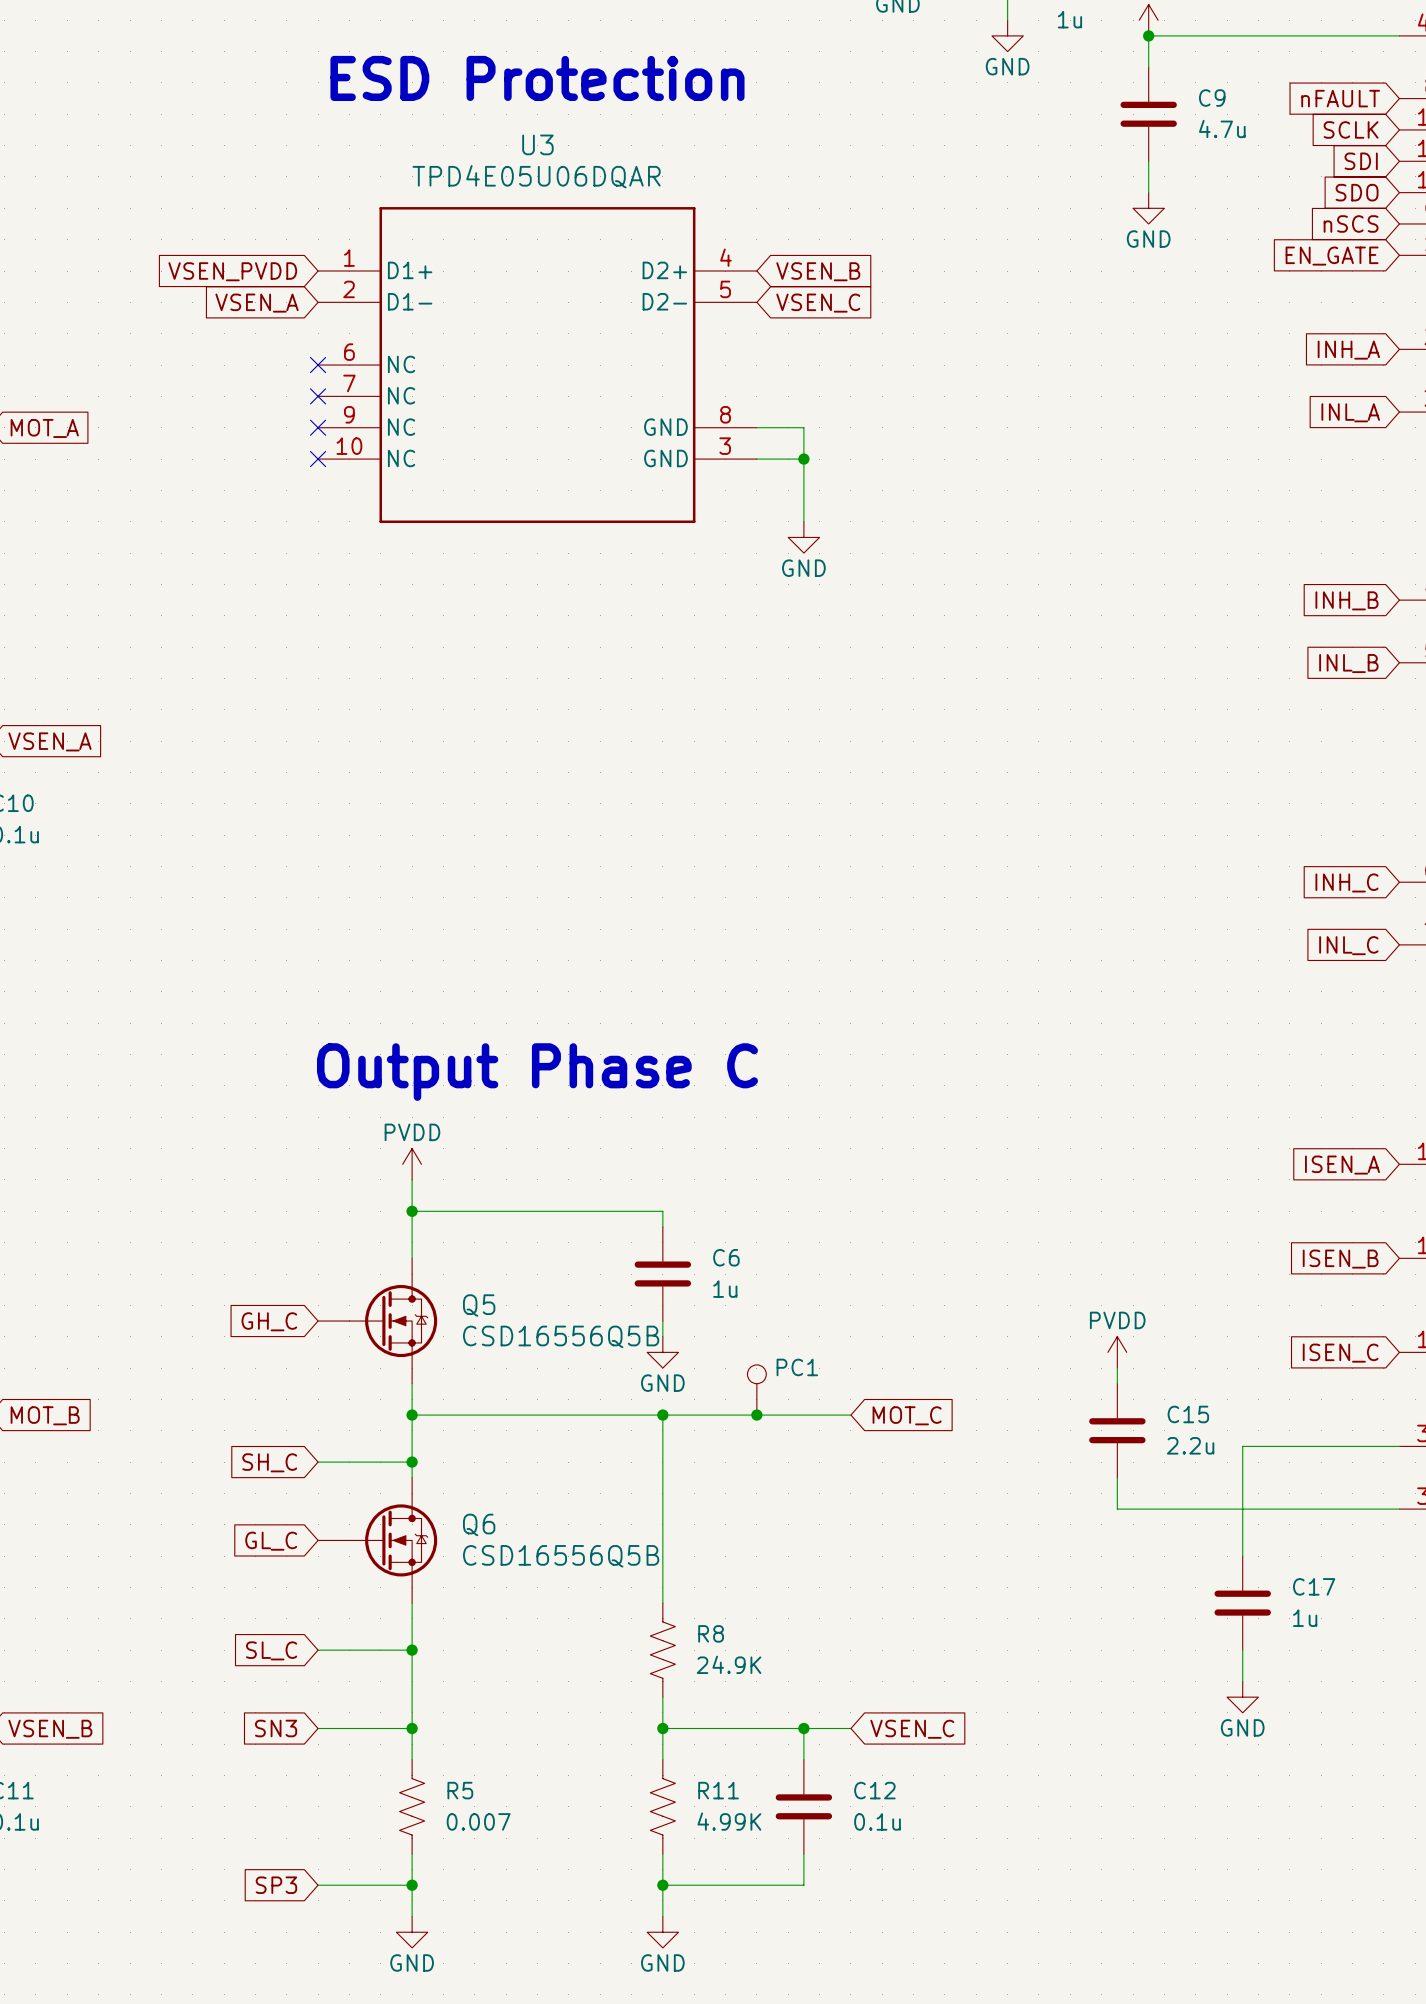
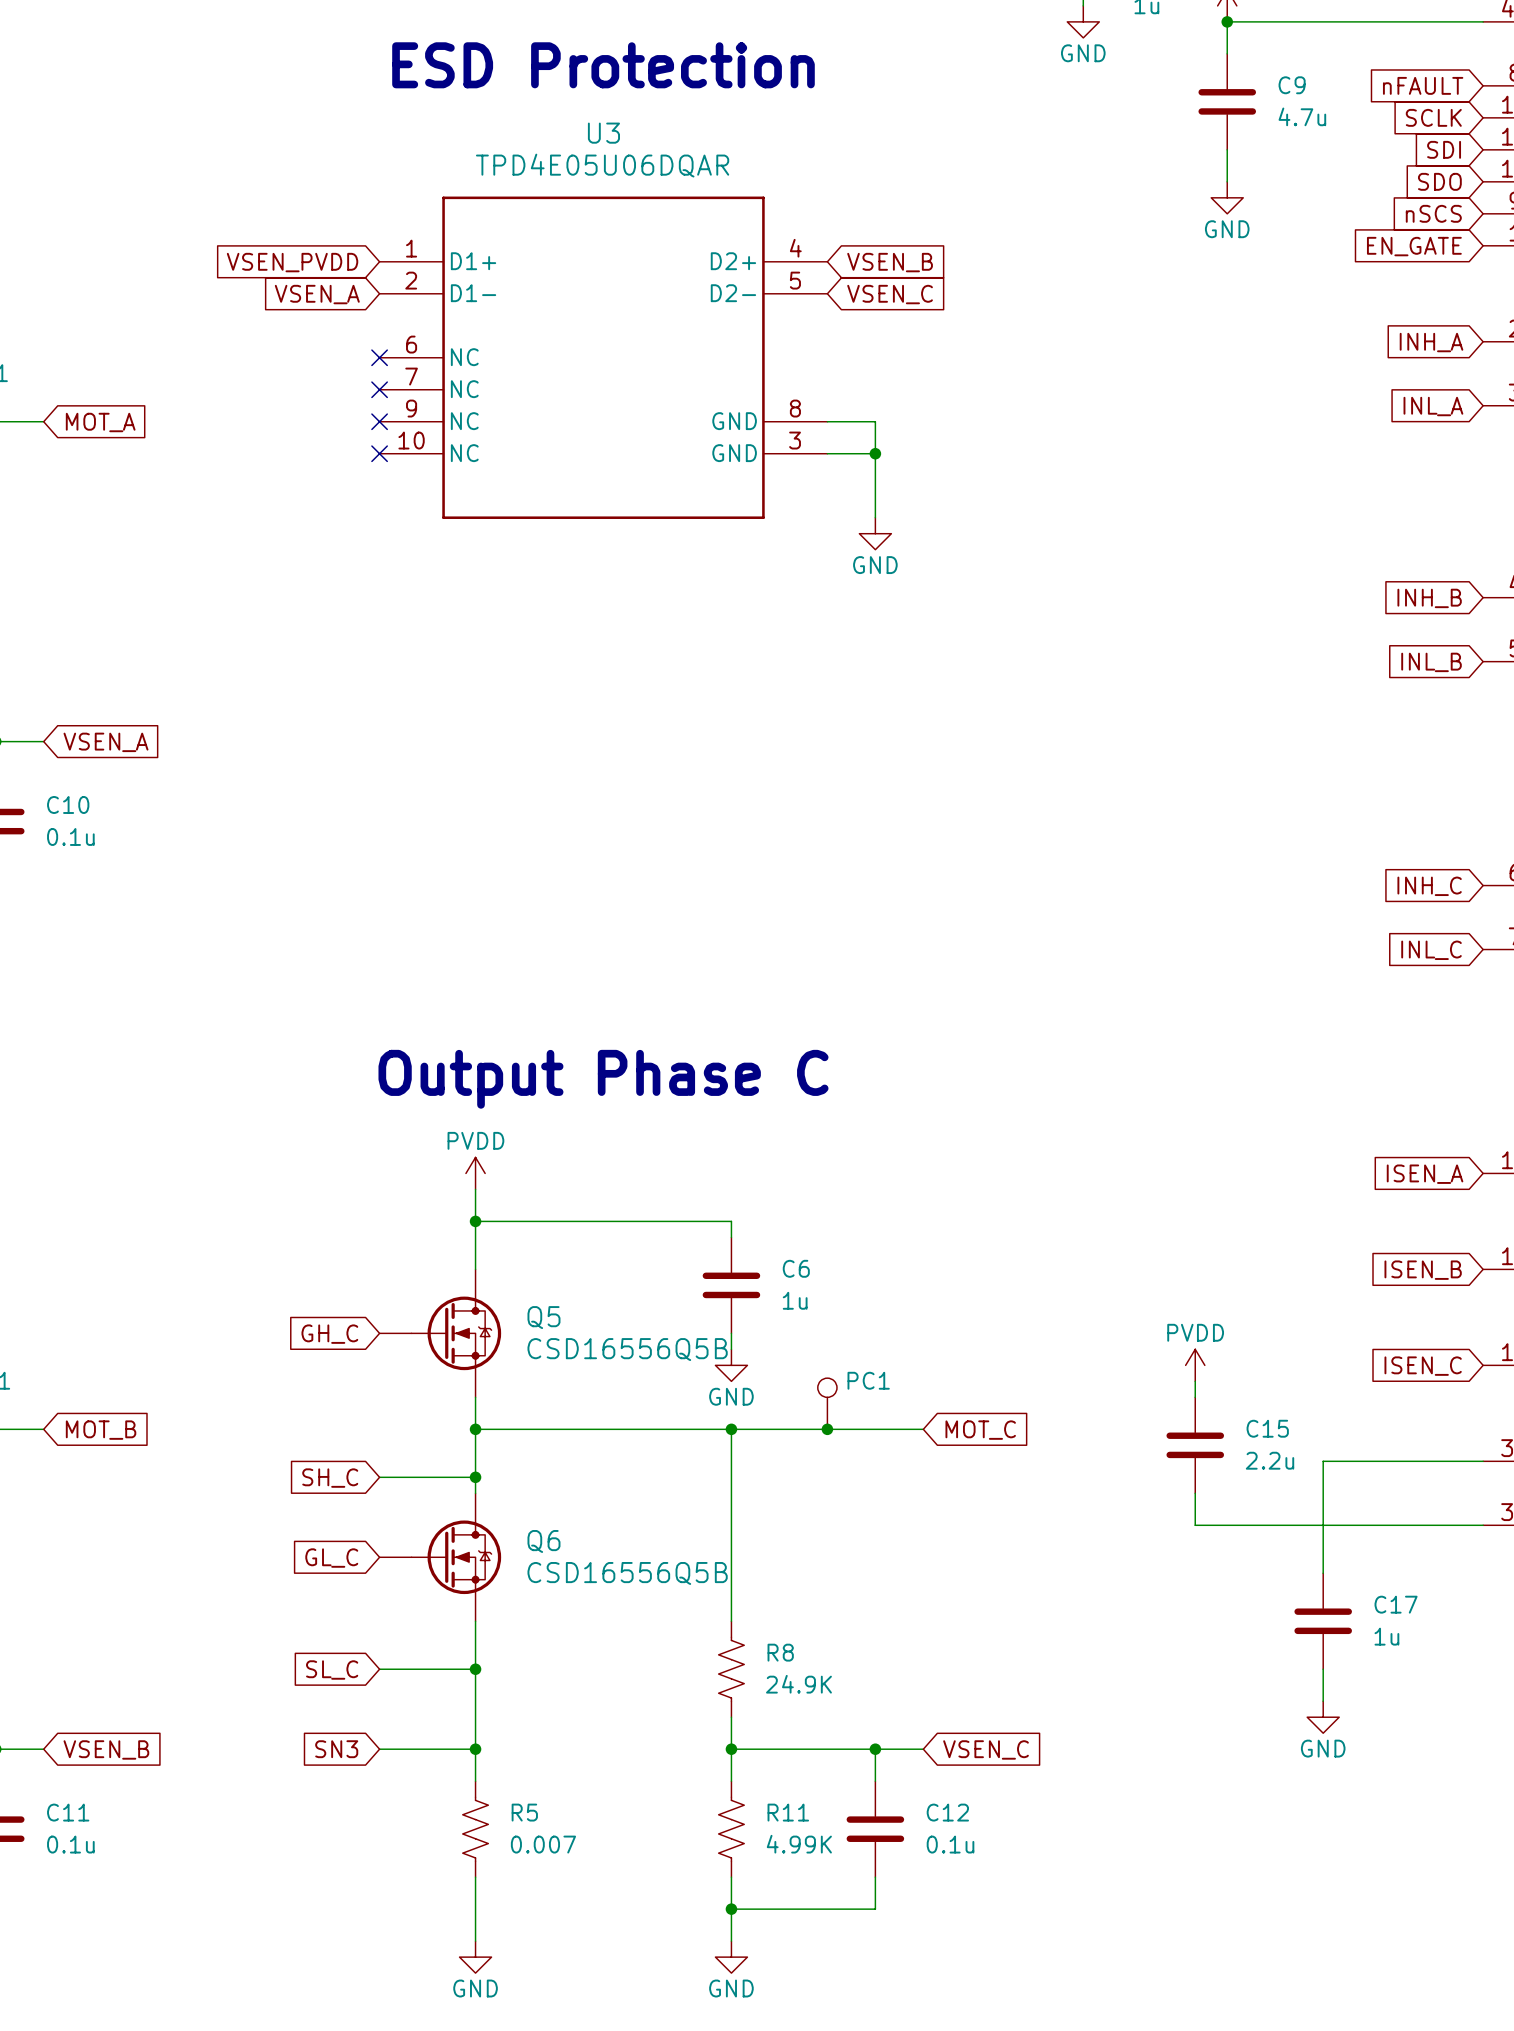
global label: SP3 (276, 1885) -> none
wire: (318, 1885) (412, 1885) -> none
junction: (412, 1885) -> none

